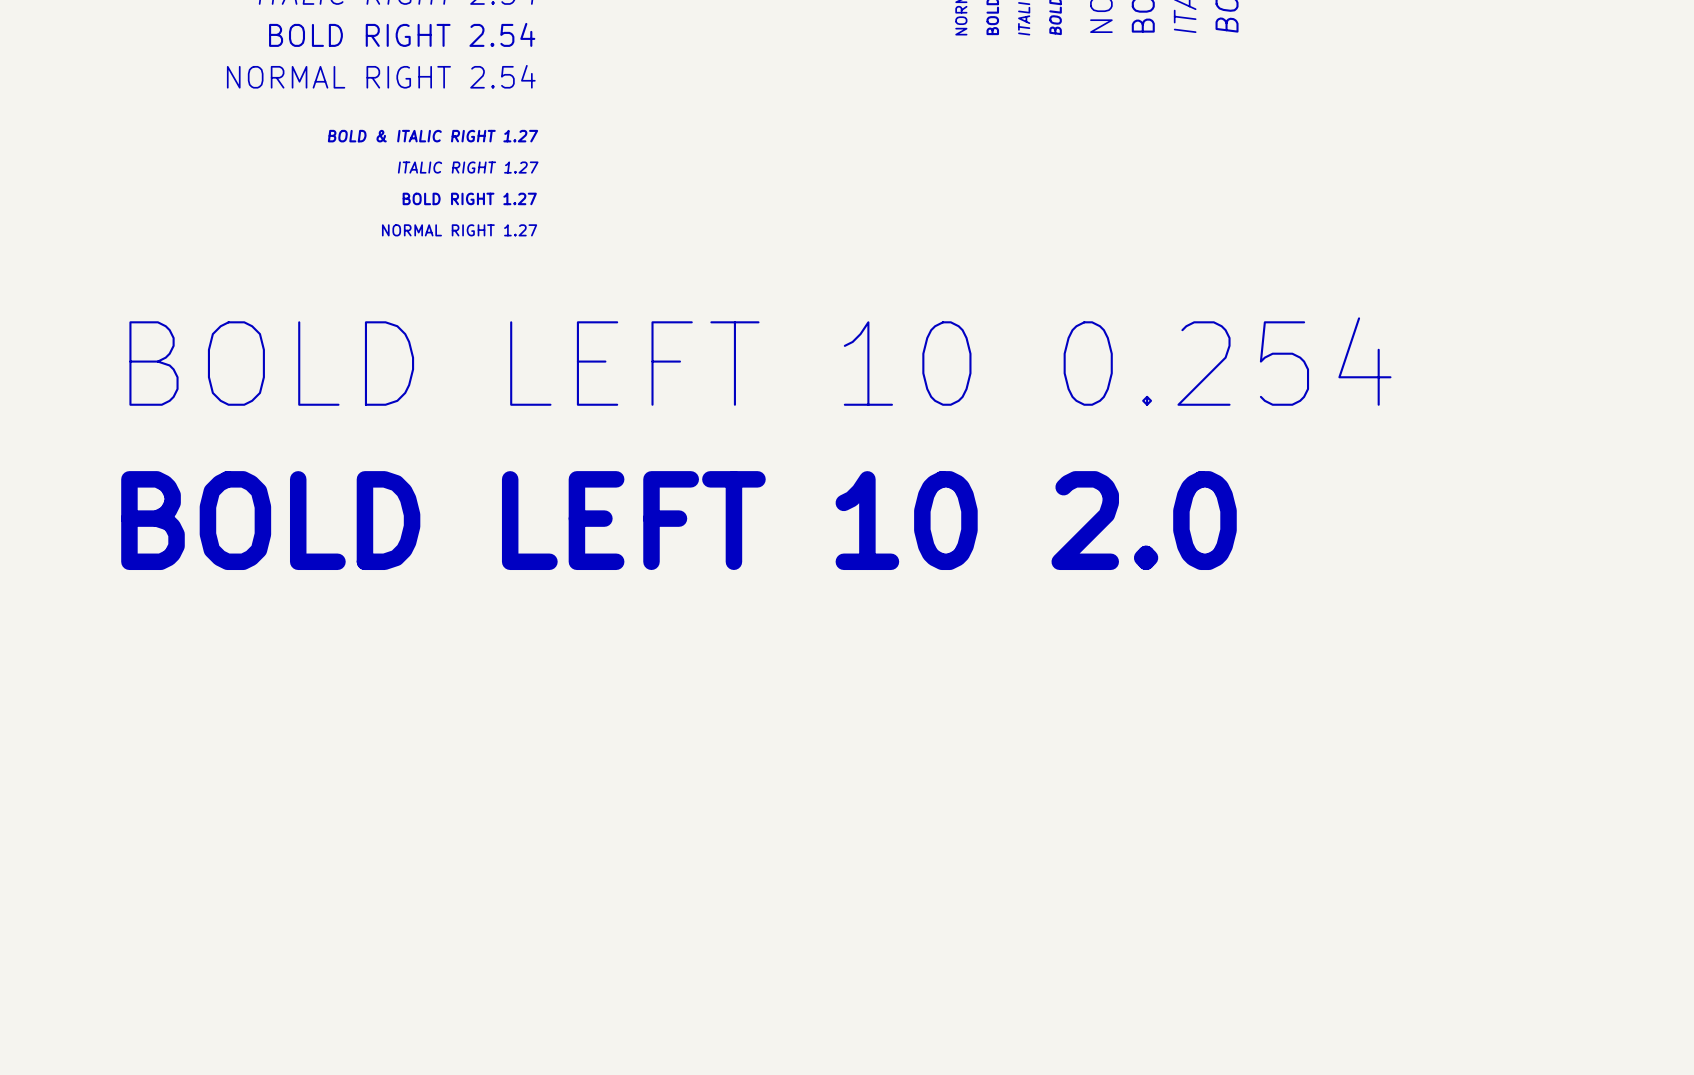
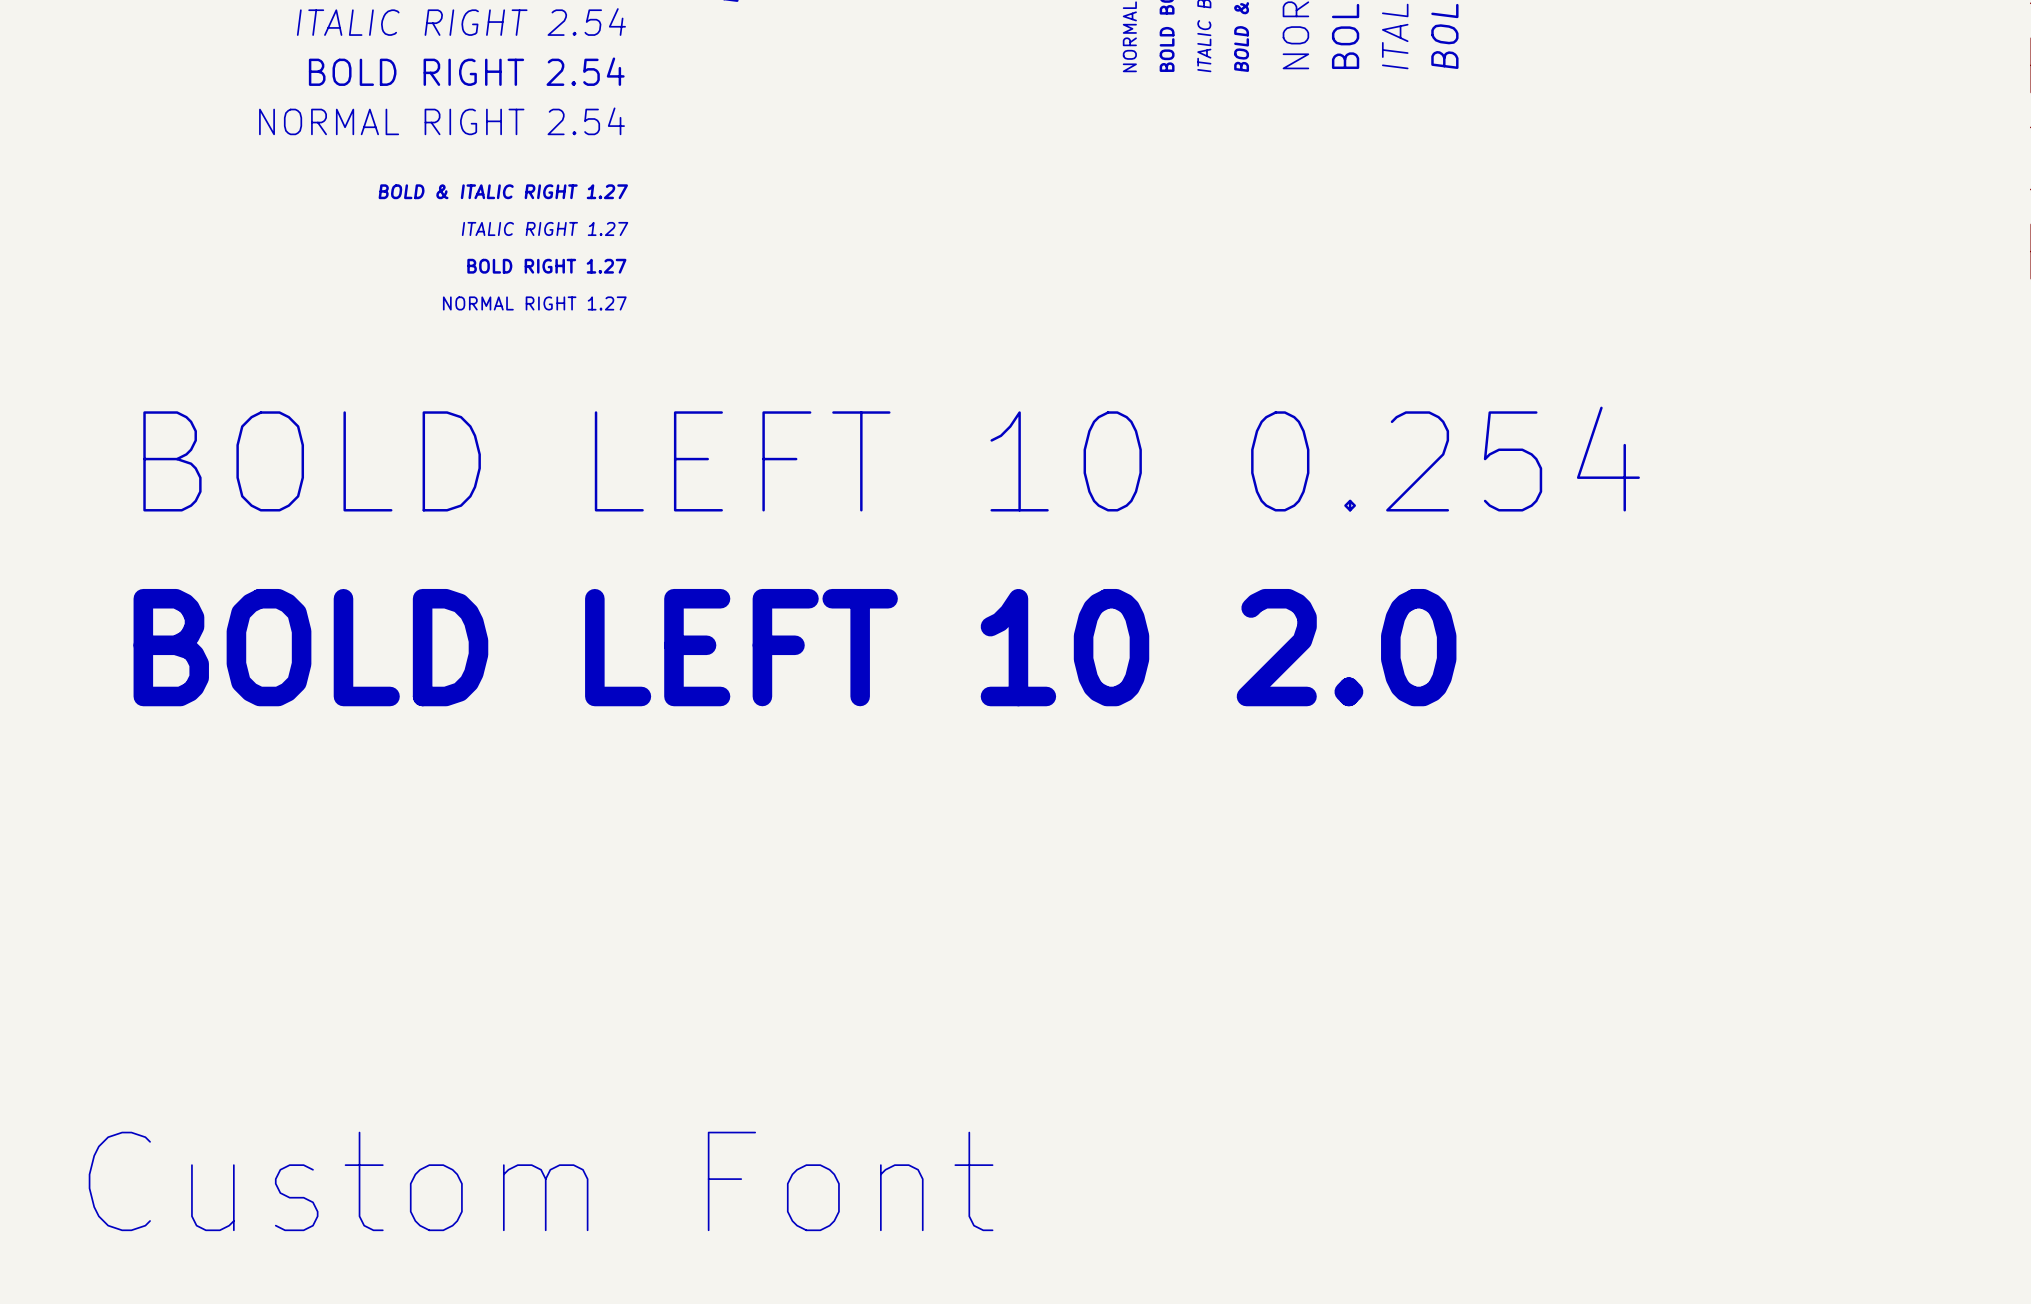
text: none -> Custom Font (541, 1181)

